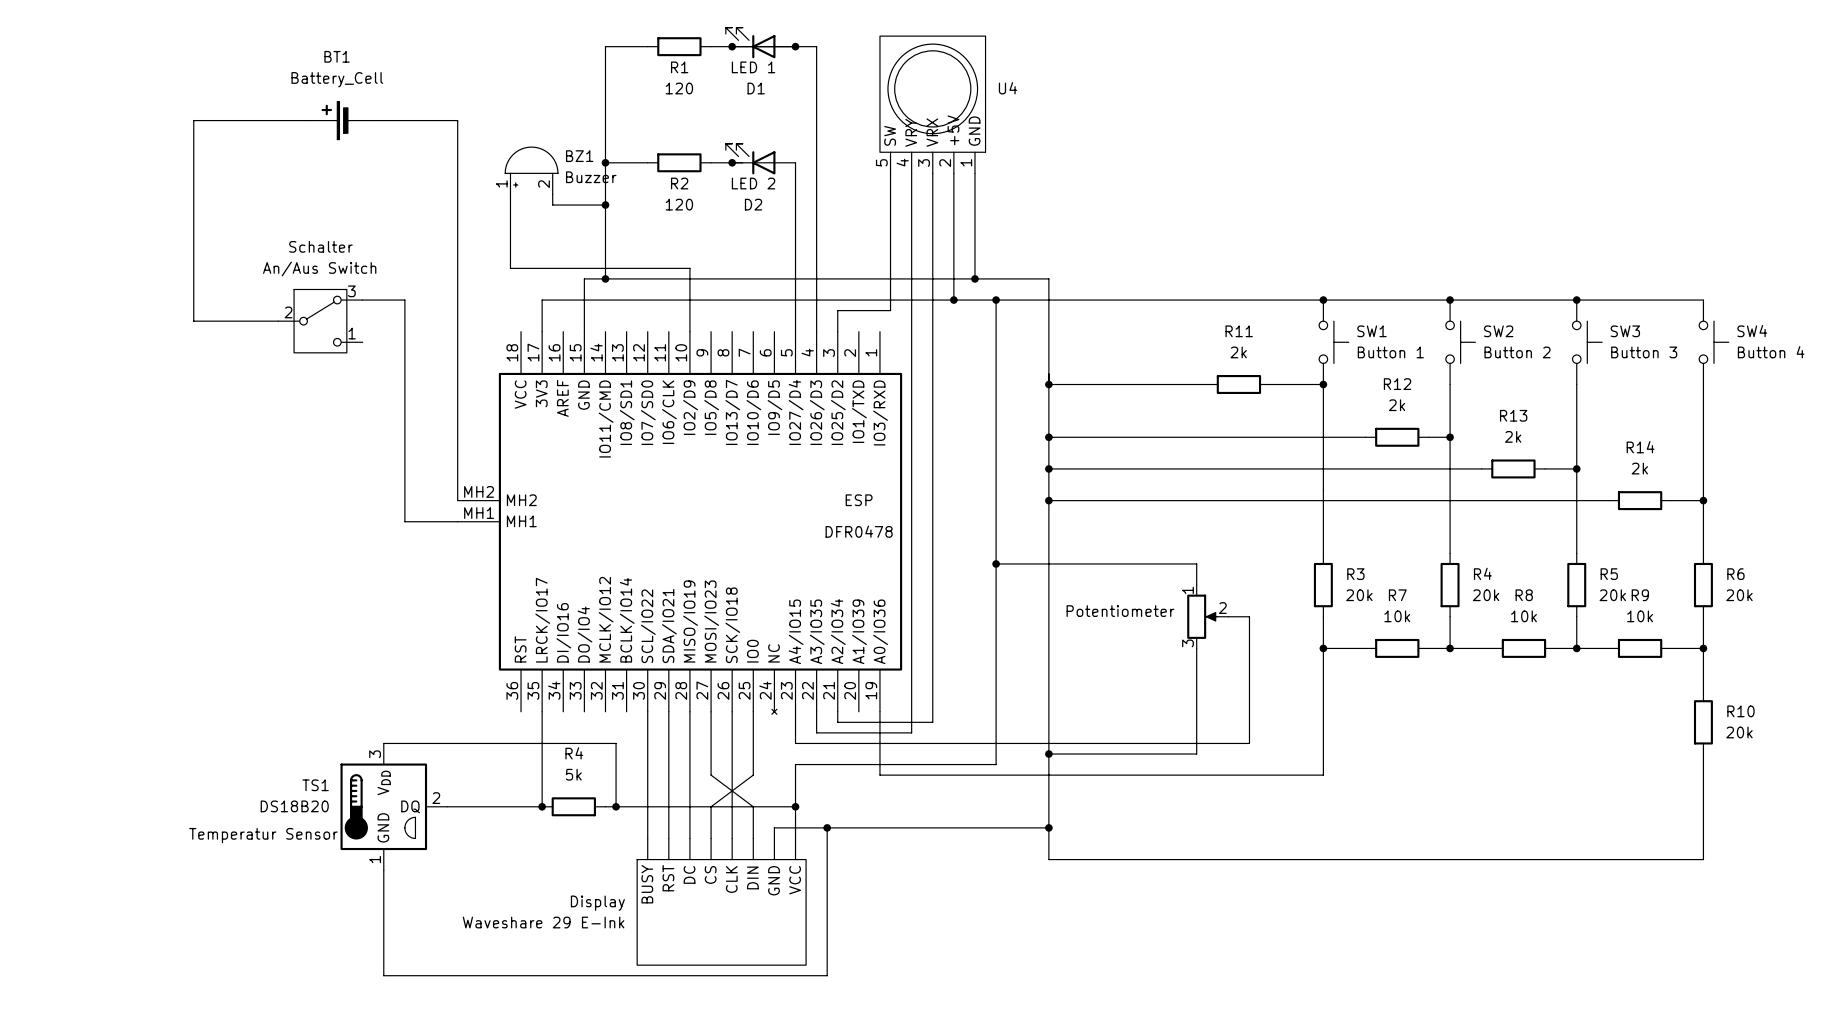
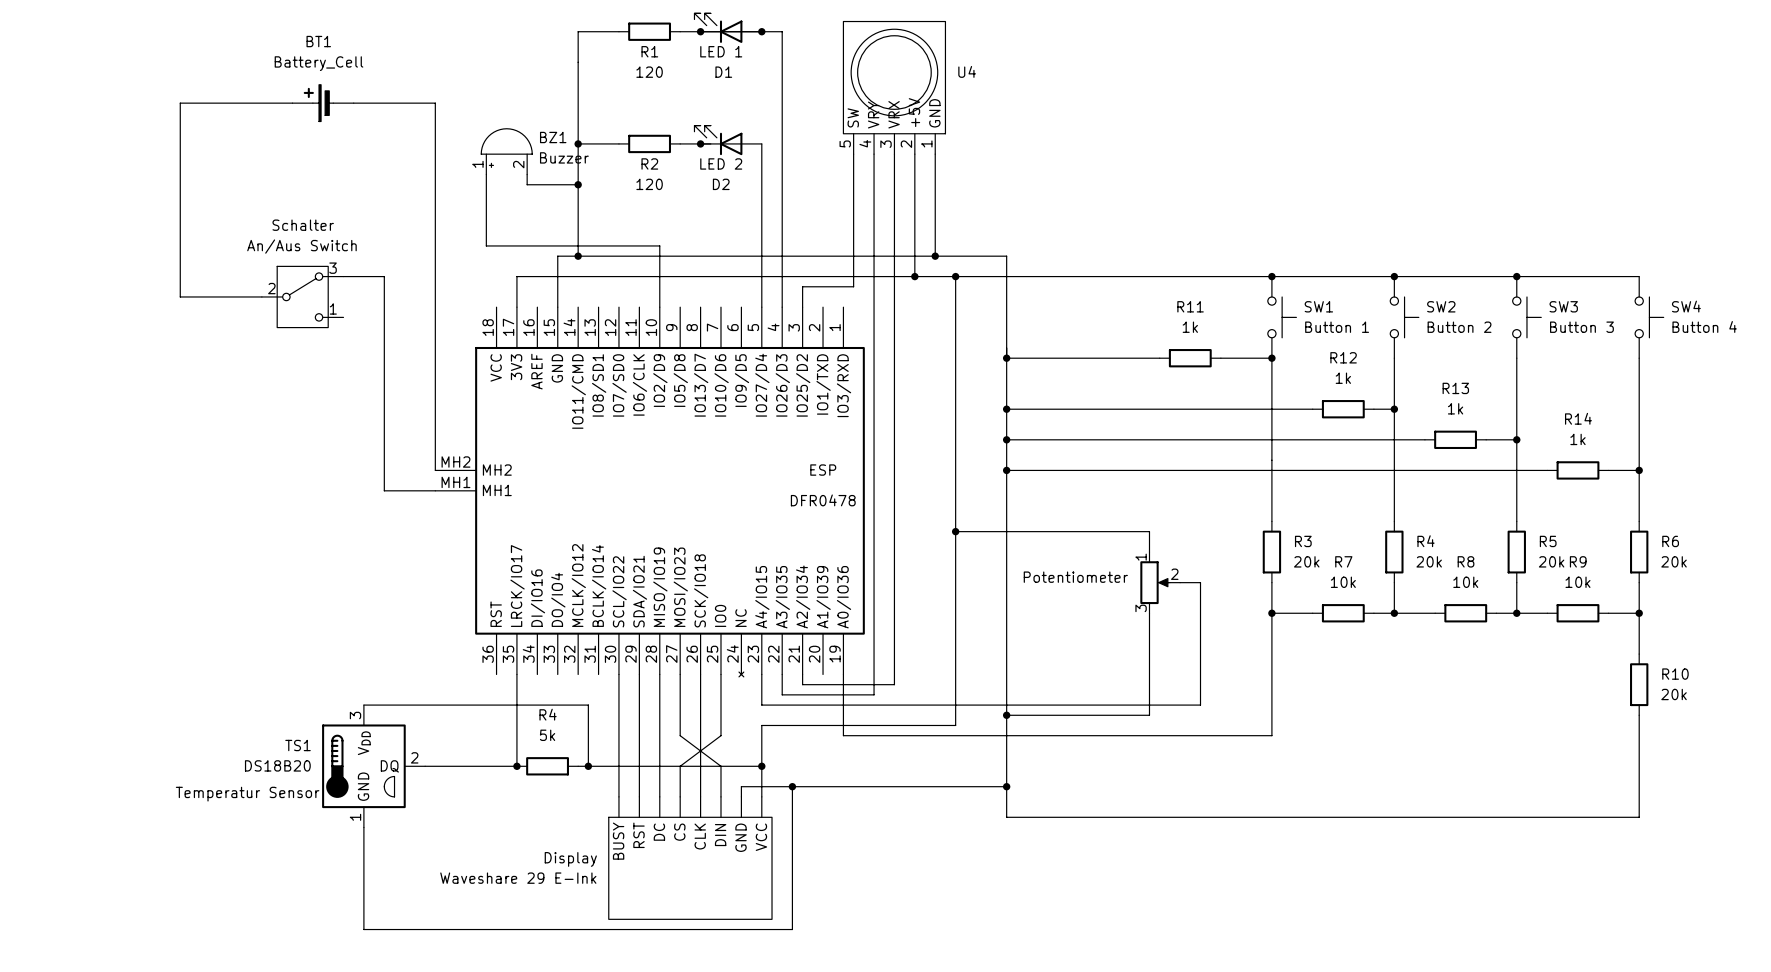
R11 value: 2k (1238, 352) -> 1k (1190, 327)
R12 value: 2k (1397, 405) -> 1k (1343, 378)
R13 value: 2k (1513, 436) -> 1k (1455, 408)
R14 value: 2k (1639, 468) -> 1k (1577, 439)

